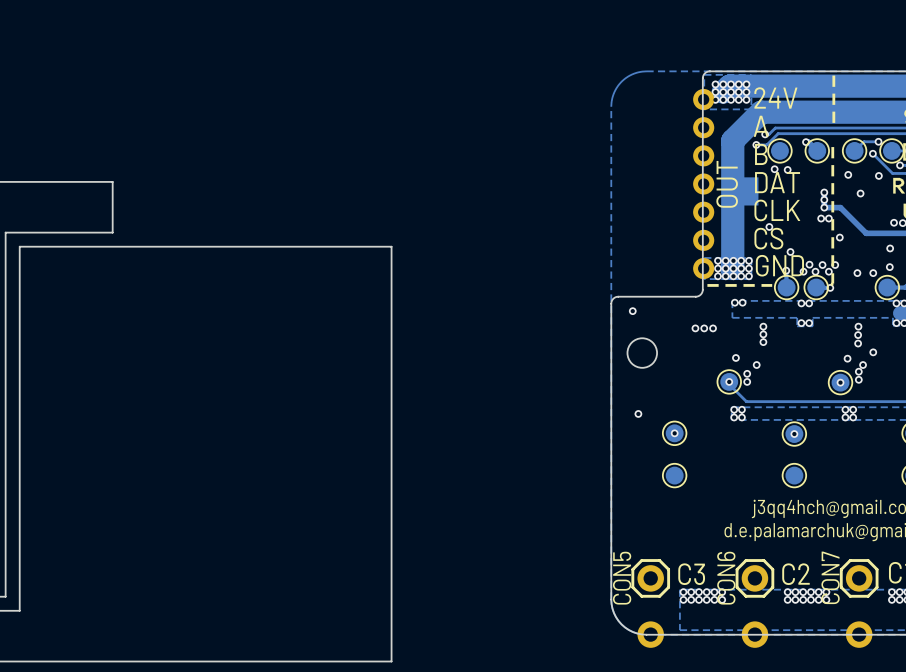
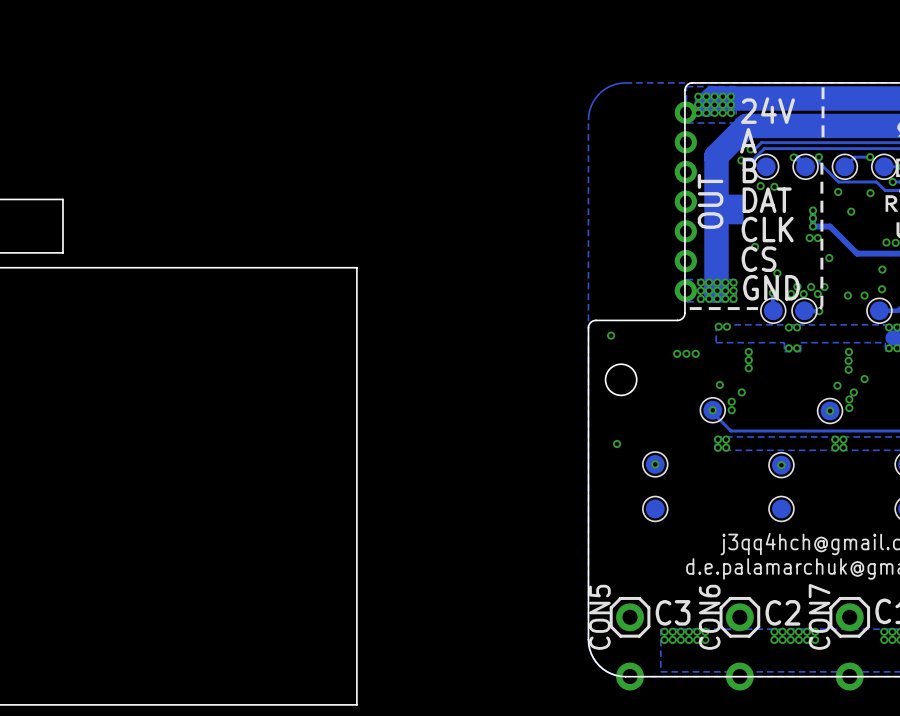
via: none -> (818, 157)
track: (872, 153) (892, 173) -> (818, 157) (818, 162) (838, 182) (876, 182) (885, 190)
via: (872, 153) -> none

